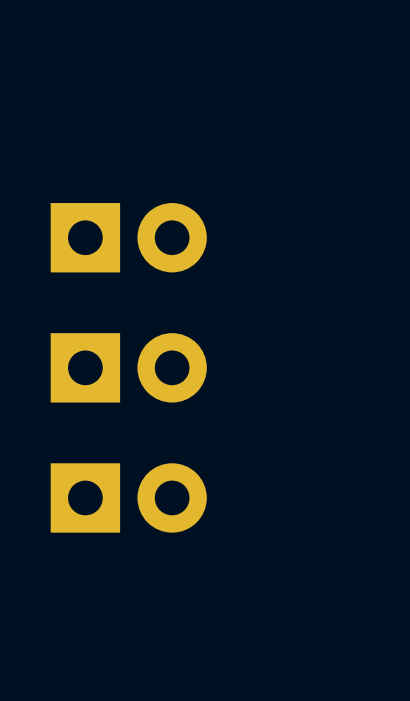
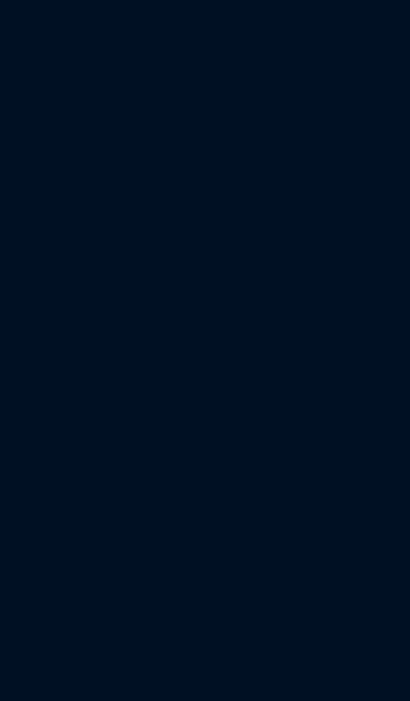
part: (128, 237) -> none
part: (128, 367) -> none
part: (128, 497) -> none

